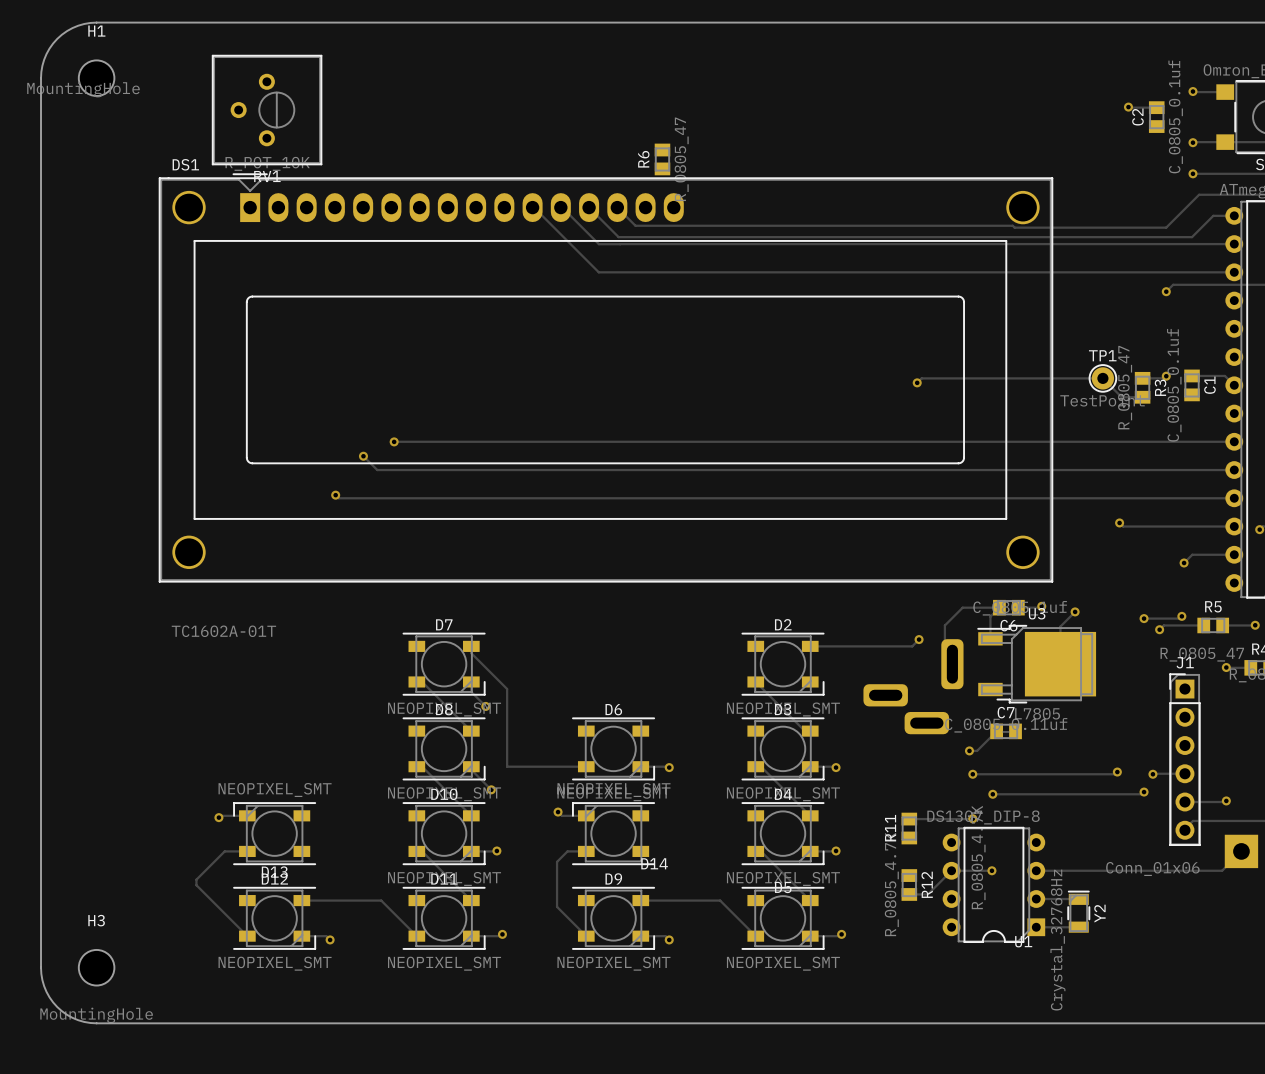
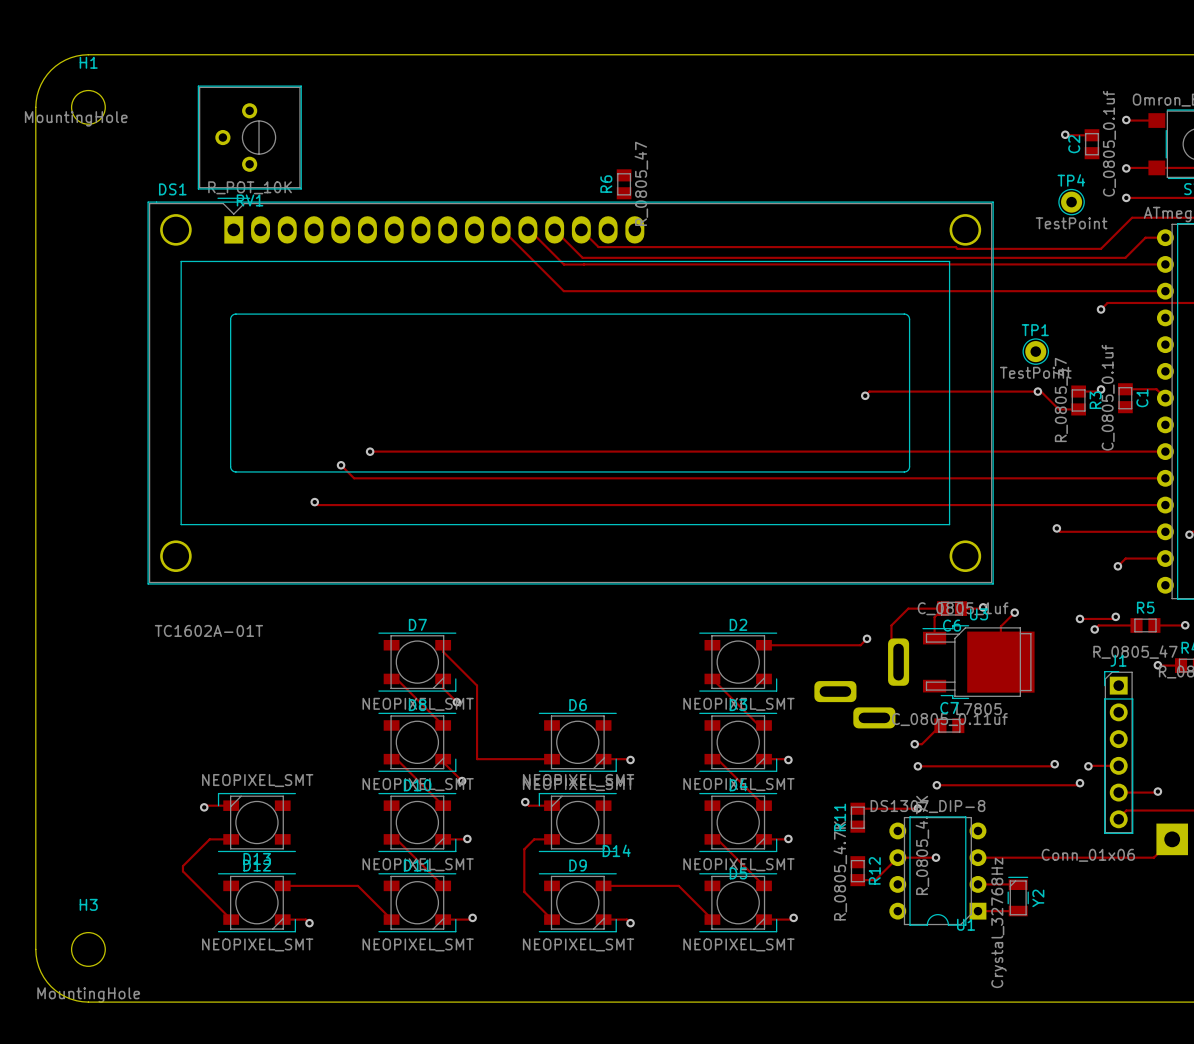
TP4: none -> TestPoint (1071, 202)
via: none -> (1037, 391)
TP1 position: (1102, 378) -> (1035, 351)

